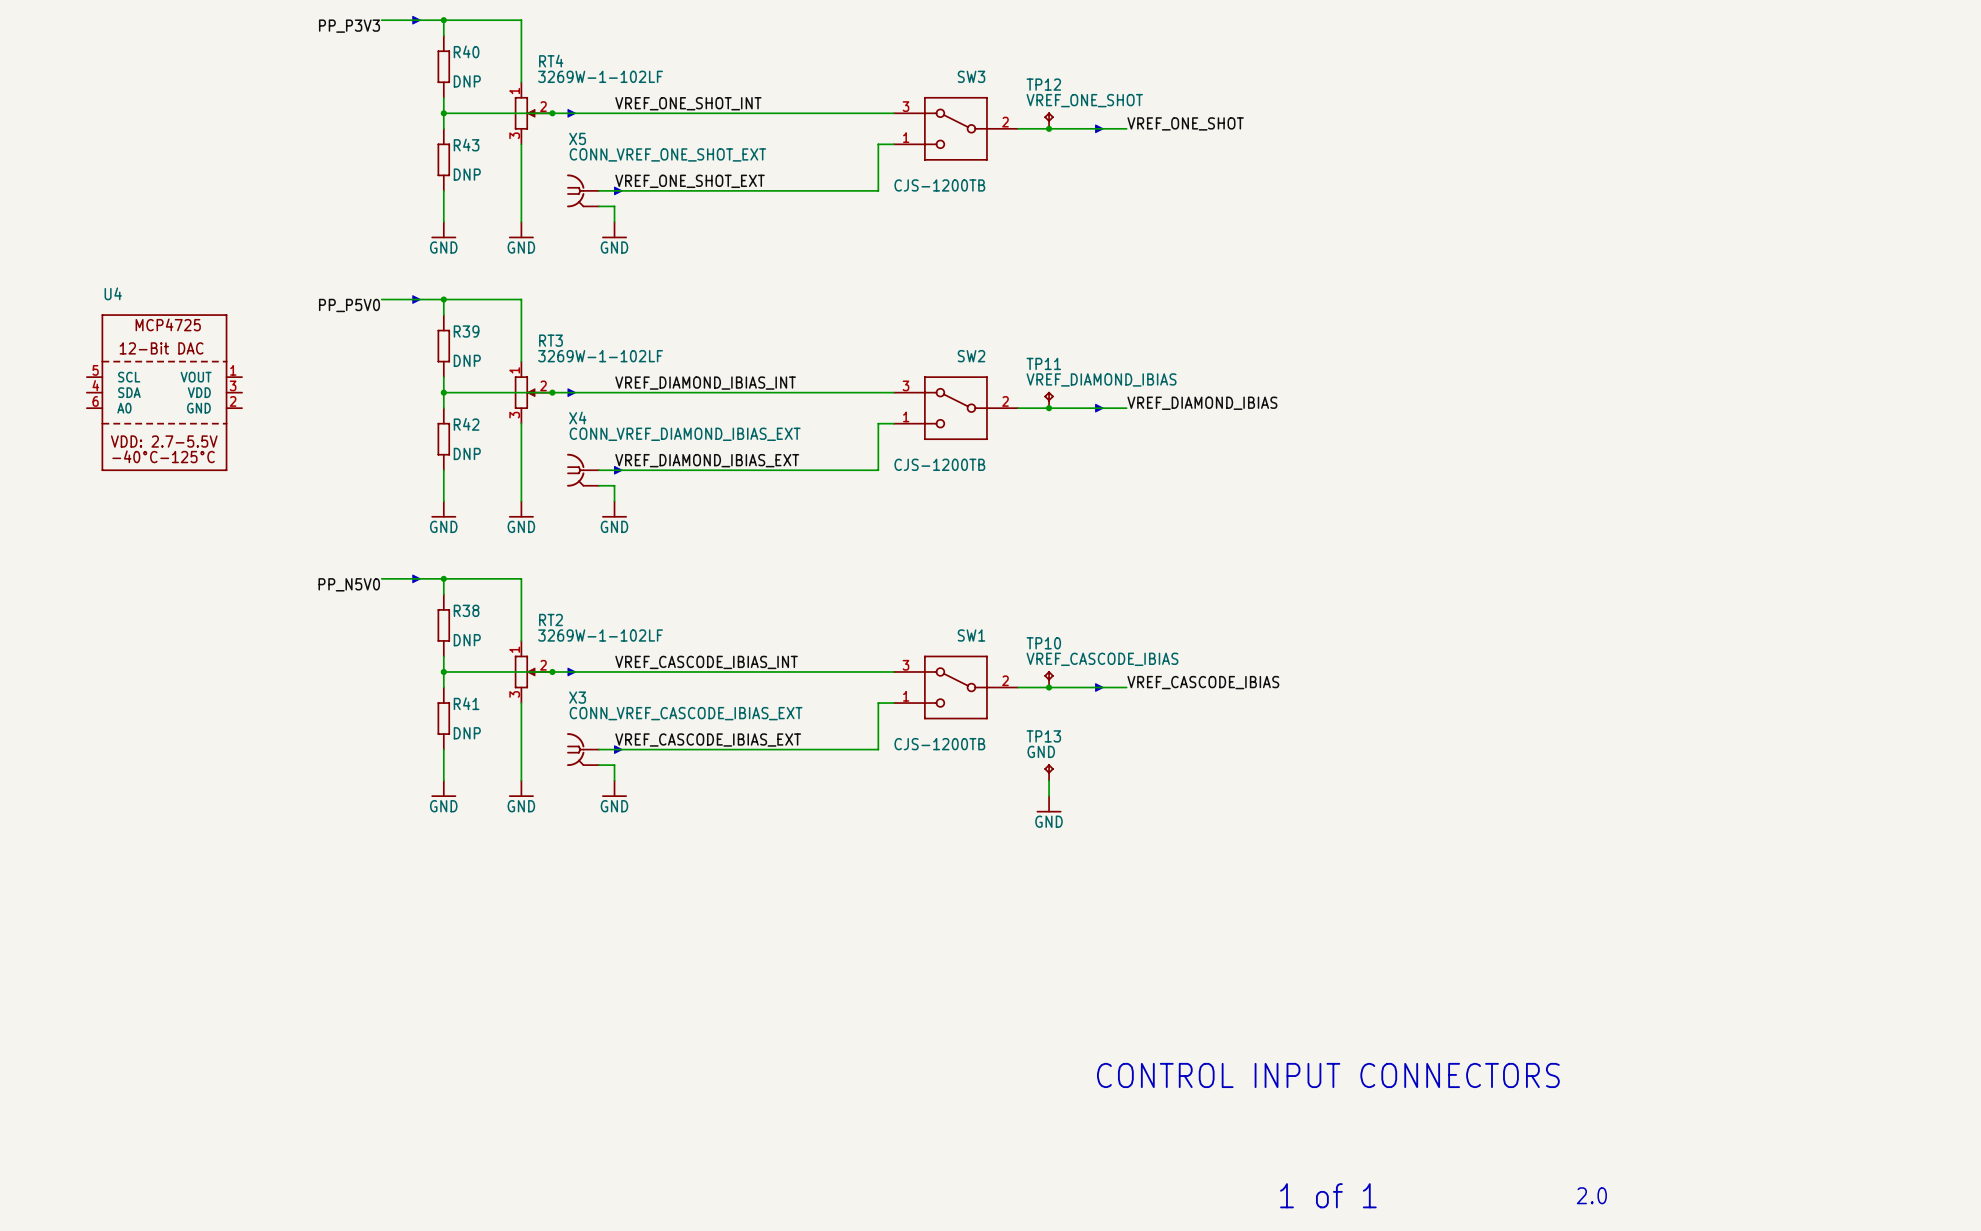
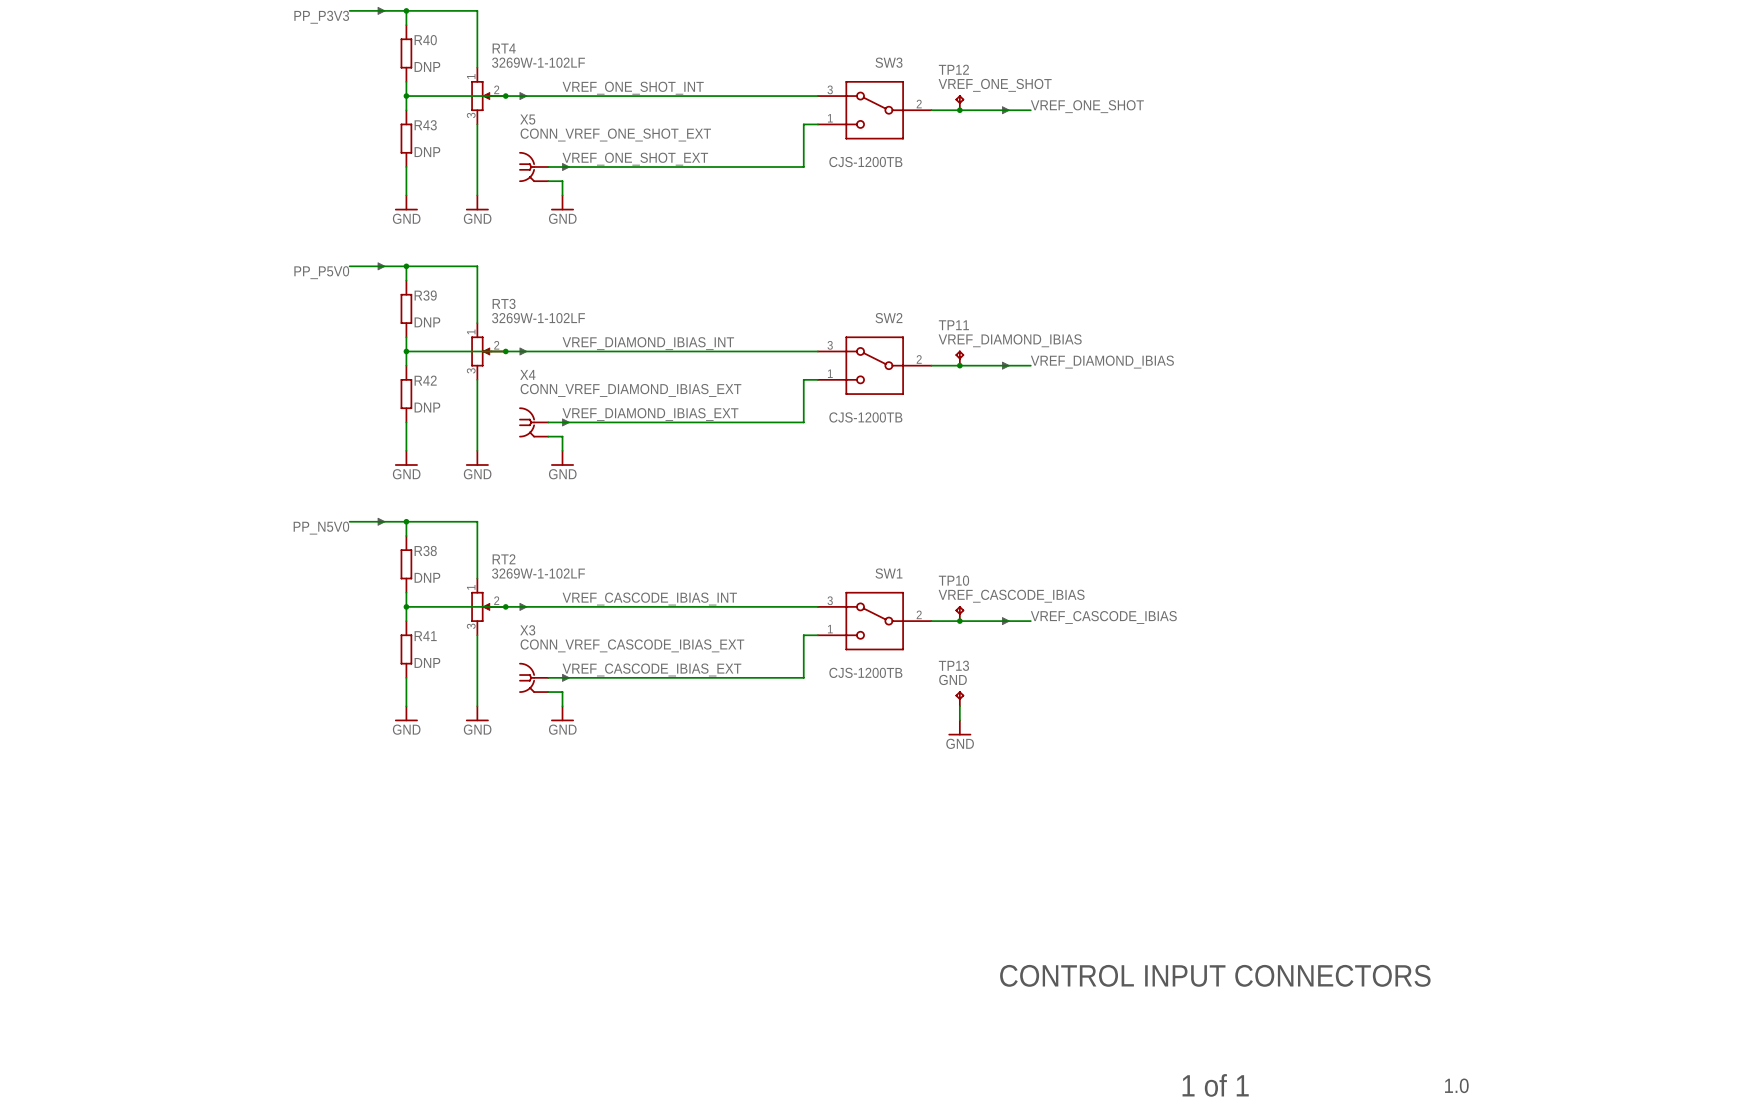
U4: (164, 392) -> none
text: 2.0 (1591, 1195) -> 1.0 (1456, 1085)

